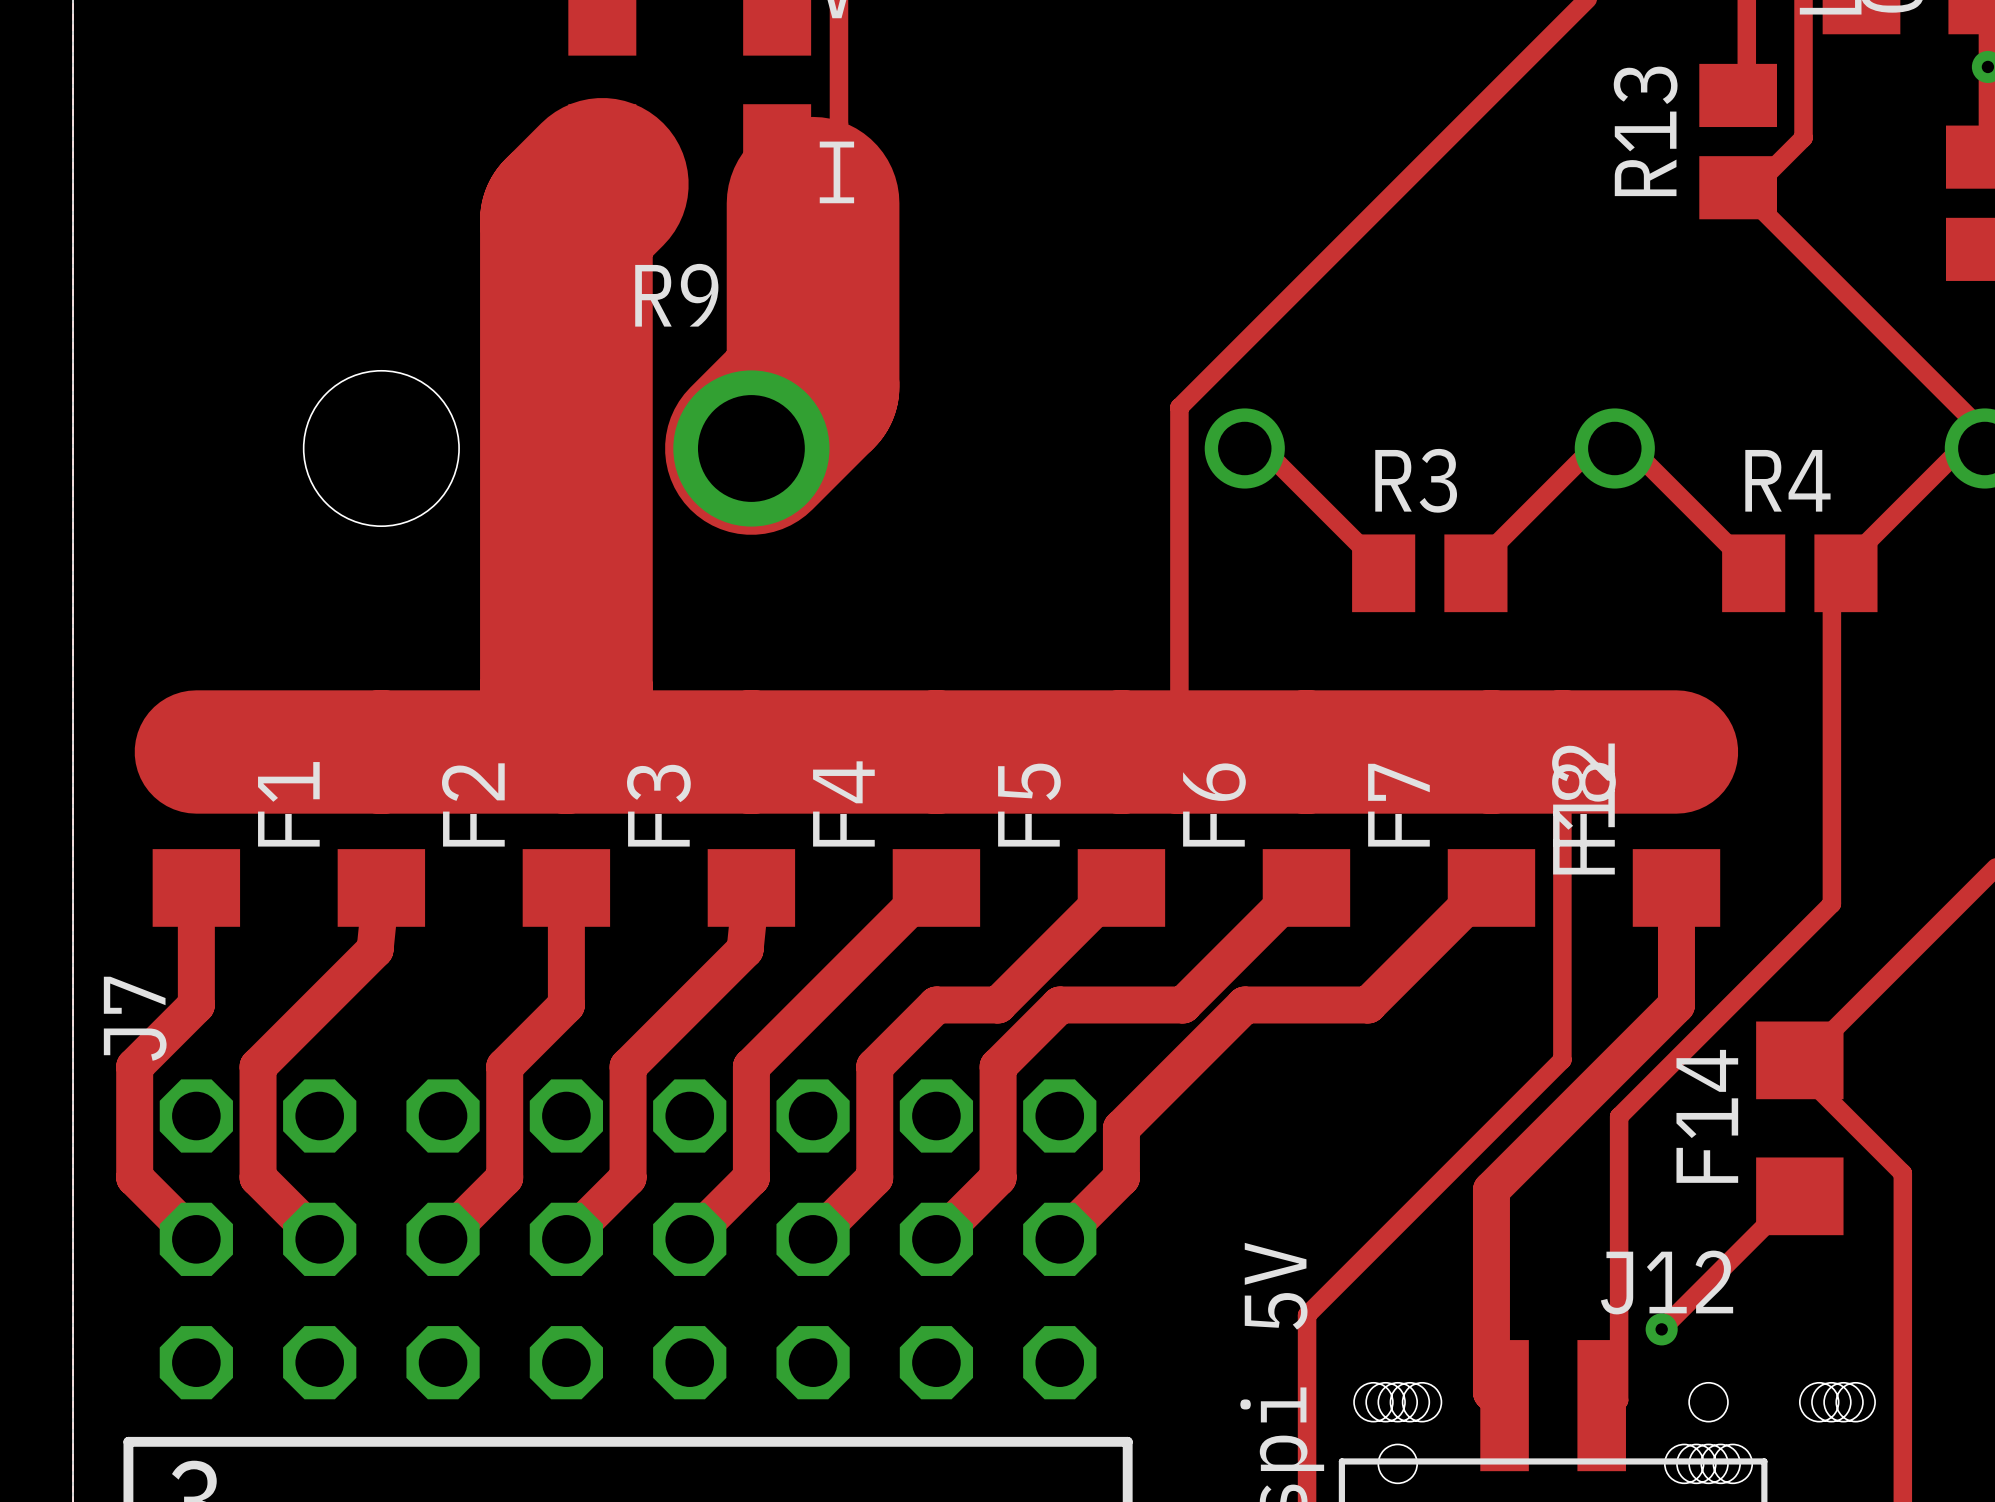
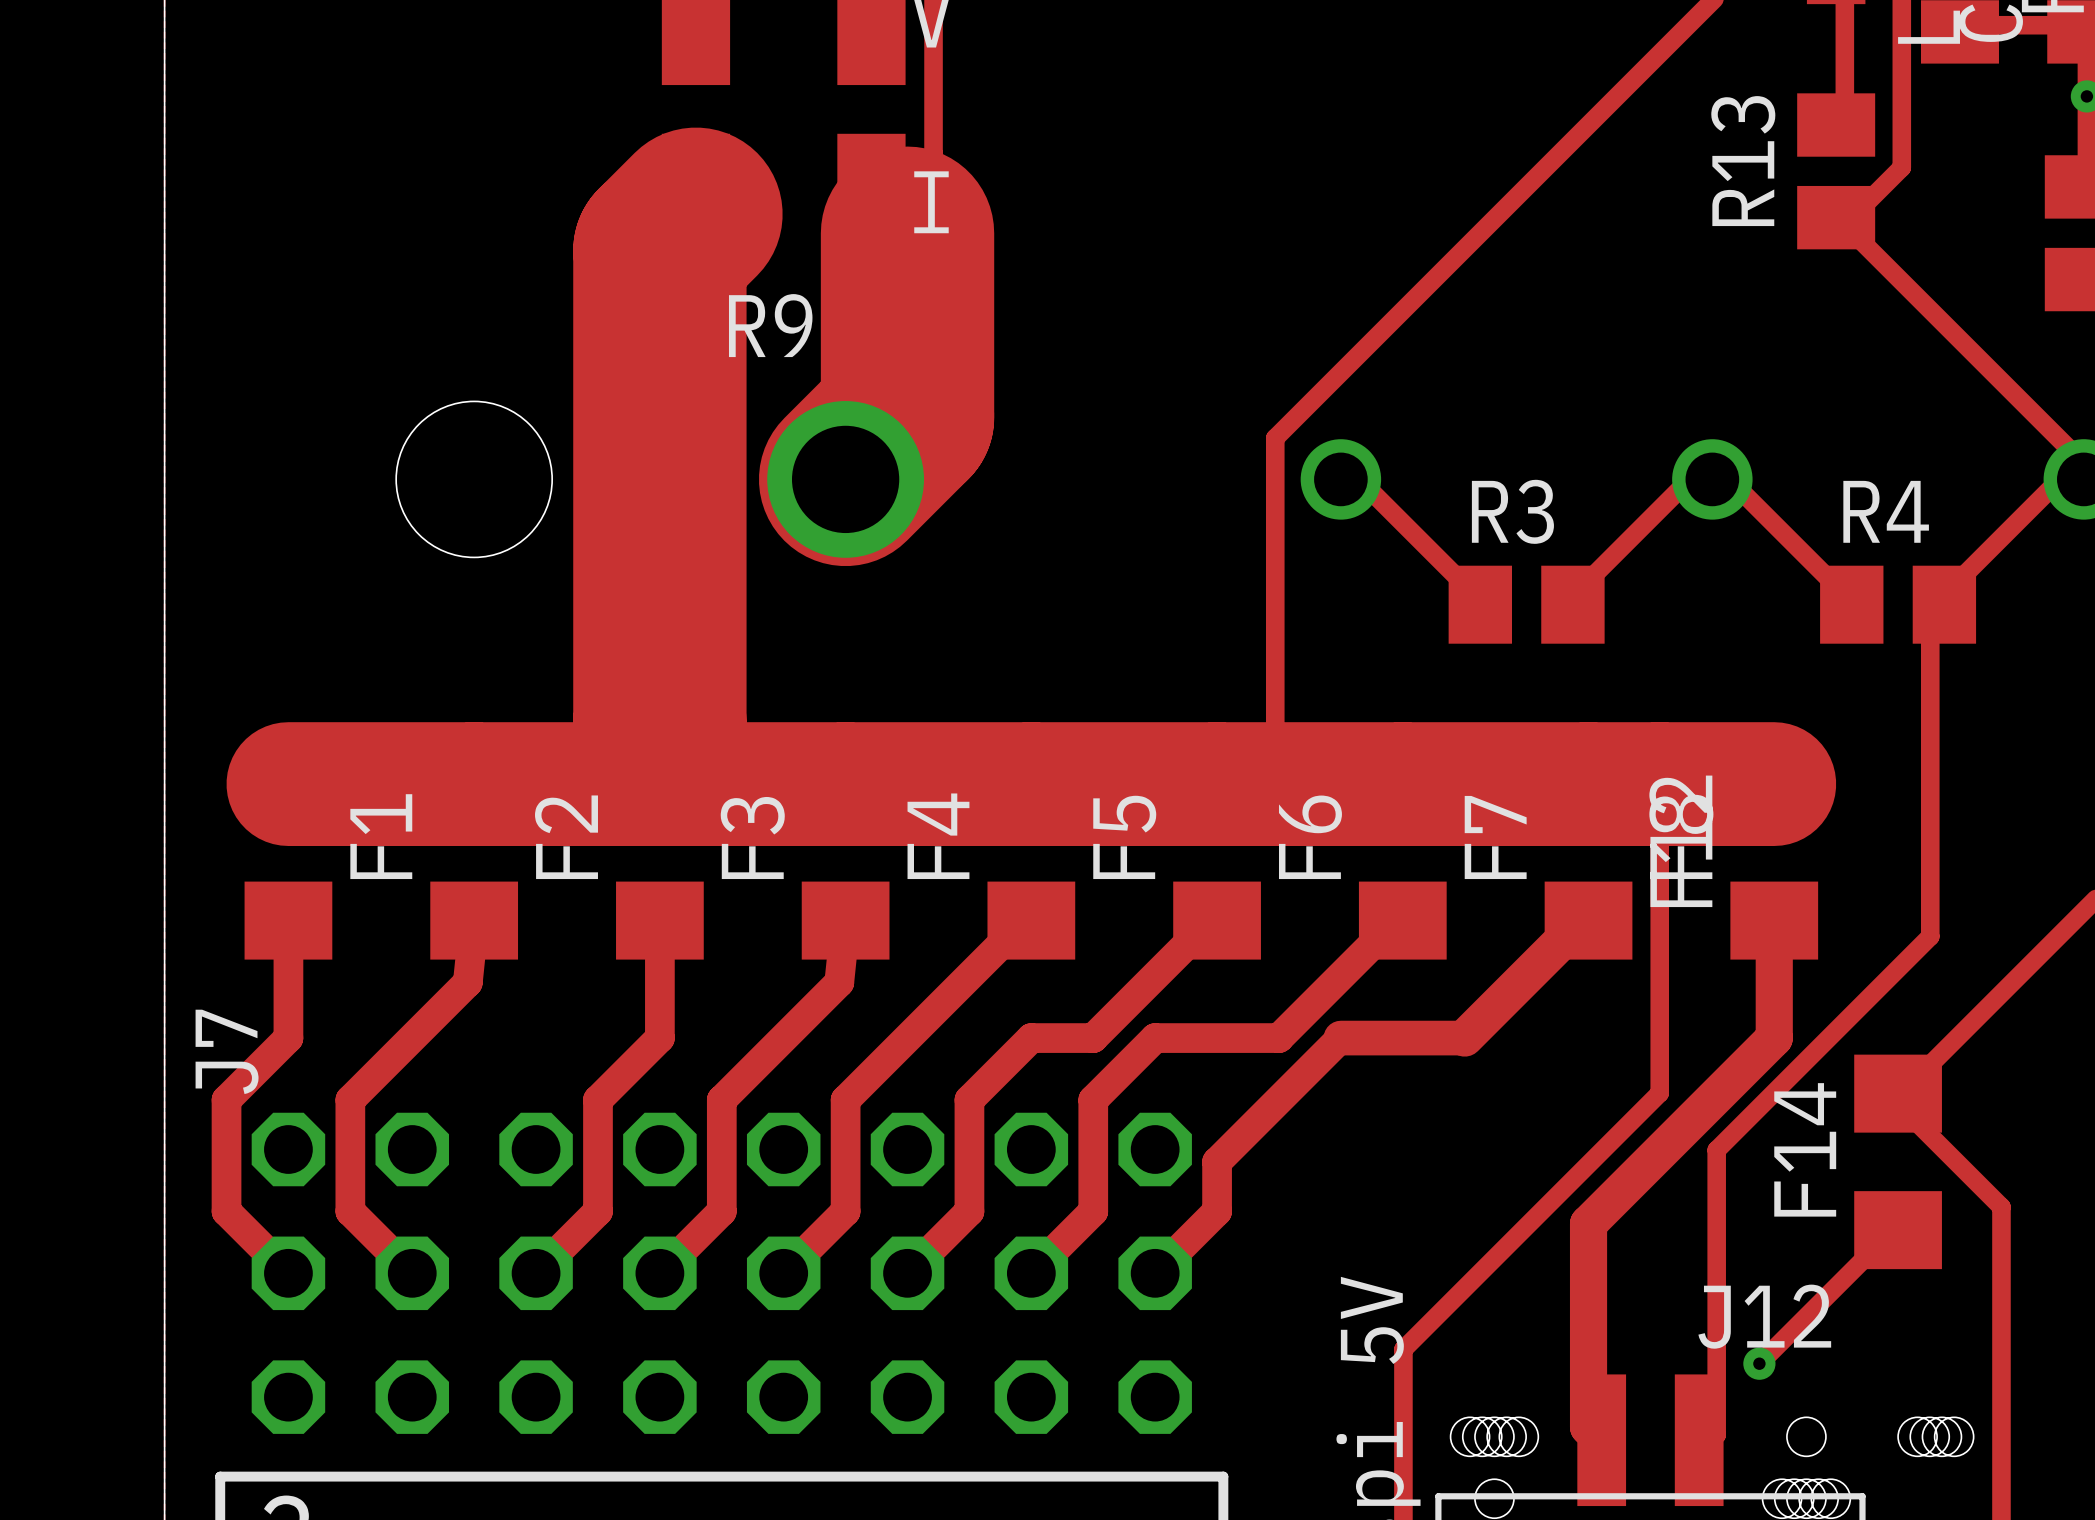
track width: thick (196, 887) (196, 1004) (134, 1066) (134, 1177) (196, 1239) -> thin (288, 920) (288, 1038) (226, 1099) (226, 1211) (288, 1273)
track width: thick (381, 887) (375, 949) (258, 1066) (258, 1177) (319, 1239) -> thin (474, 920) (467, 982) (350, 1099) (350, 1211) (412, 1273)
track width: thick (566, 887) (566, 1004) (504, 1066) (504, 1177) (443, 1239) -> thin (659, 920) (659, 1038) (597, 1099) (597, 1211) (536, 1273)
track width: thick (751, 887) (745, 949) (628, 1066) (628, 1177) (566, 1239) -> thin (845, 920) (839, 982) (721, 1099) (721, 1211) (659, 1273)
track width: thick (930, 887) (751, 1066) (751, 1177) (689, 1239) -> thin (1025, 920) (845, 1099) (845, 1211) (783, 1273)
track width: thick (1115, 887) (998, 1004) (936, 1004) (874, 1066) (874, 1177) (813, 1239) -> thin (1210, 920) (1093, 1038) (1031, 1038) (969, 1099) (969, 1211) (907, 1273)
track width: thick (1300, 887) (1183, 1004) (1059, 1004) (998, 1066) (998, 1177) (936, 1239) -> thin (1396, 920) (1278, 1038) (1155, 1038) (1093, 1099) (1093, 1211) (1031, 1273)
track width: thick (1368, 1004) (1244, 1004) (1121, 1128) (1121, 1177) (1059, 1239) -> thin (1464, 1038) (1340, 1038) (1217, 1161) (1217, 1211) (1155, 1273)

